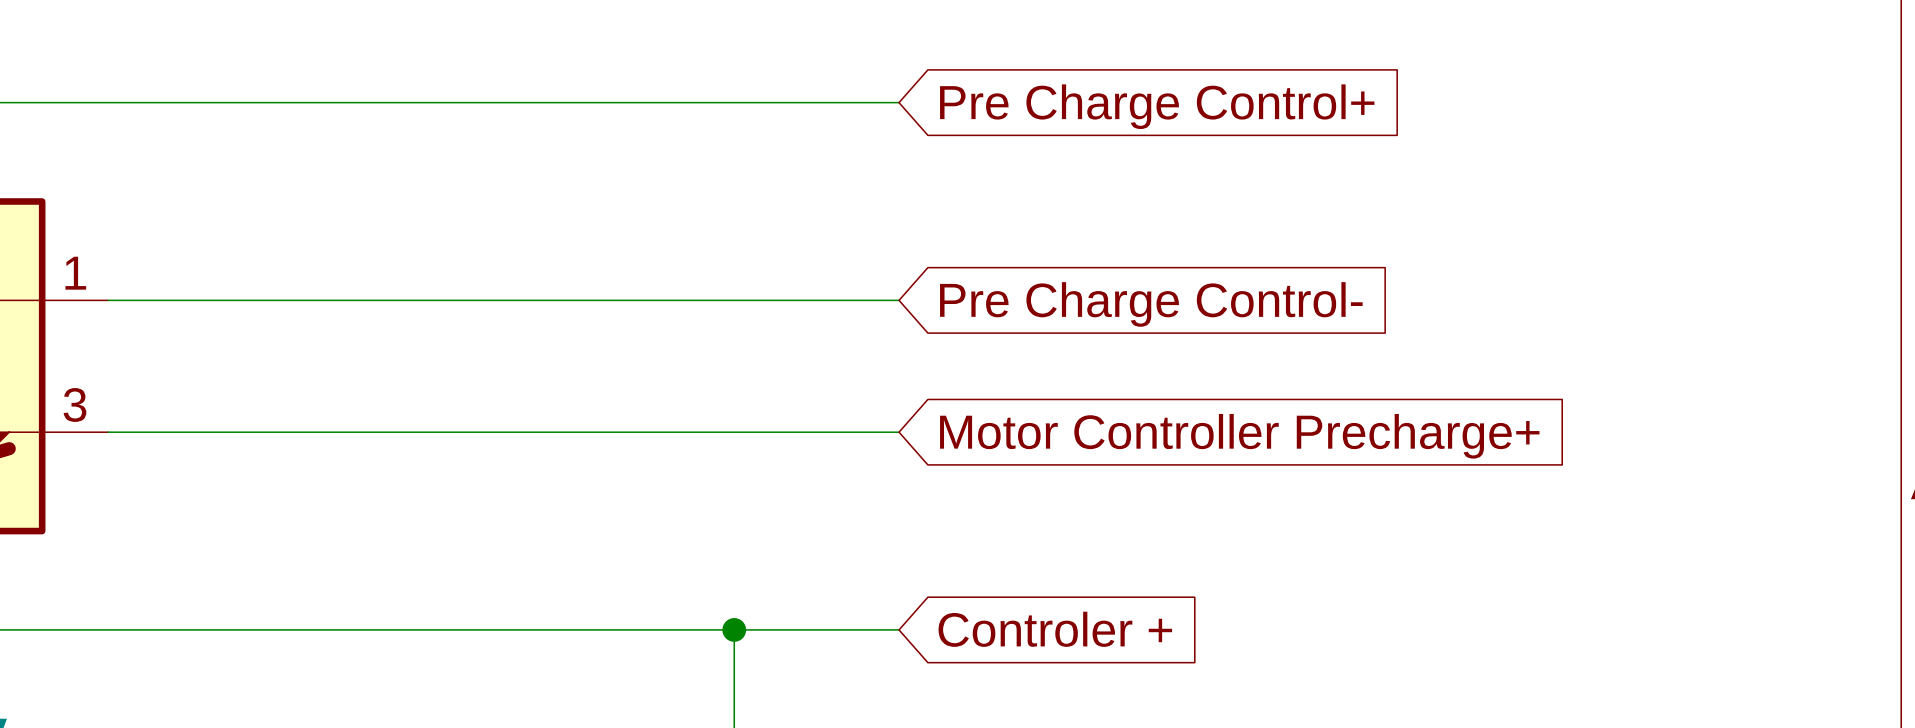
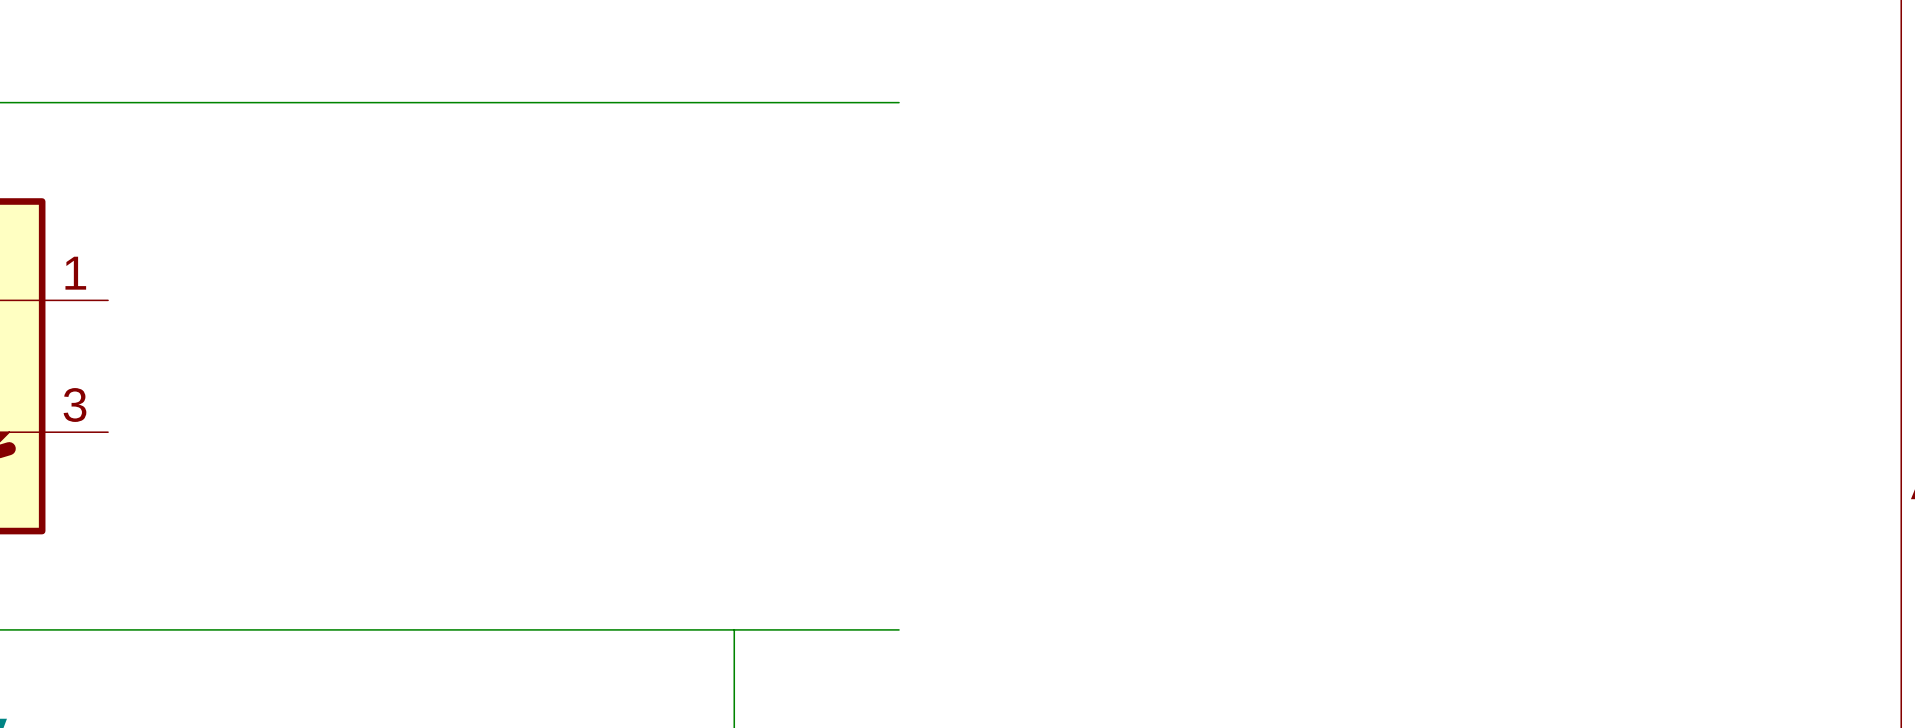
global label: Pre Charge Control+ (1157, 106) -> none
wire: (108, 300) (899, 300) -> none
global label: Pre Charge Control- (1151, 304) -> none
wire: (108, 432) (899, 432) -> none
global label: Motor Controller Precharge+ (1239, 436) -> none
junction: (734, 629) -> none
global label: Controler + (1055, 629) -> none

